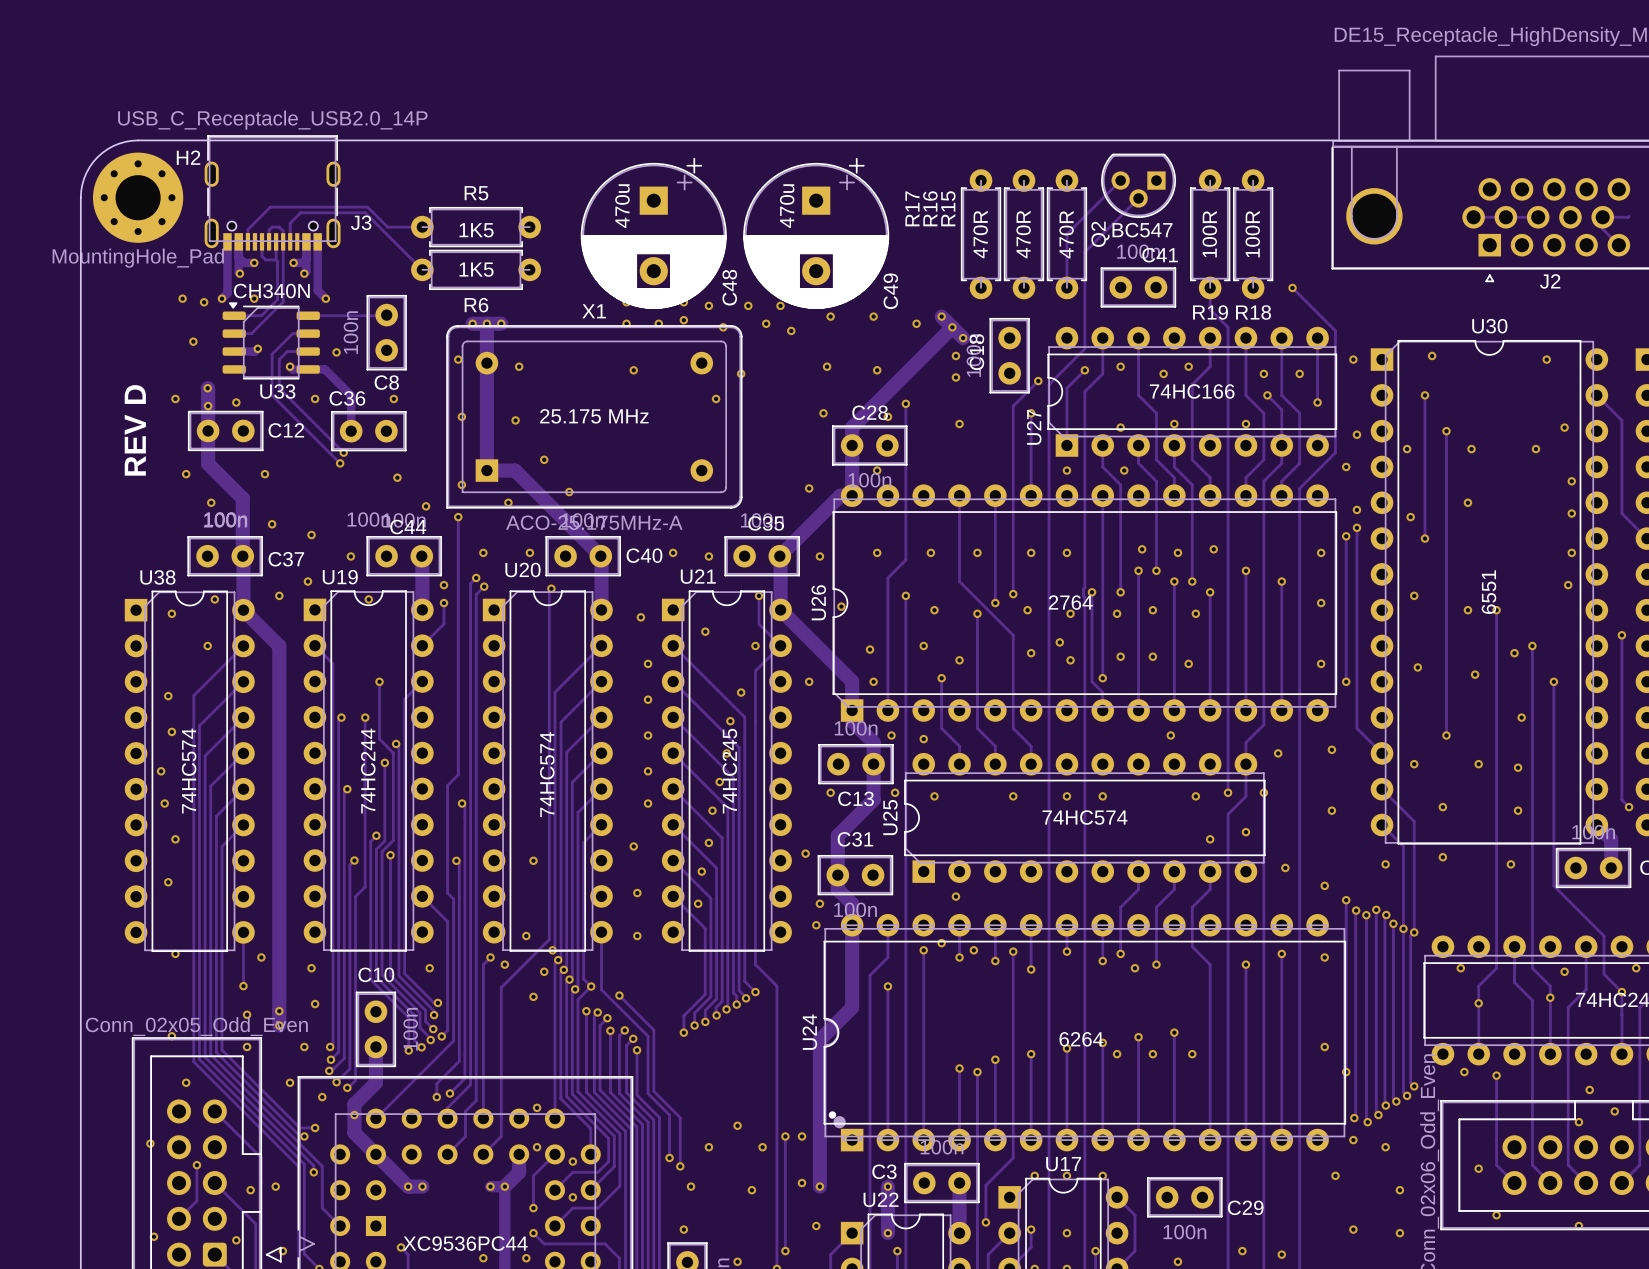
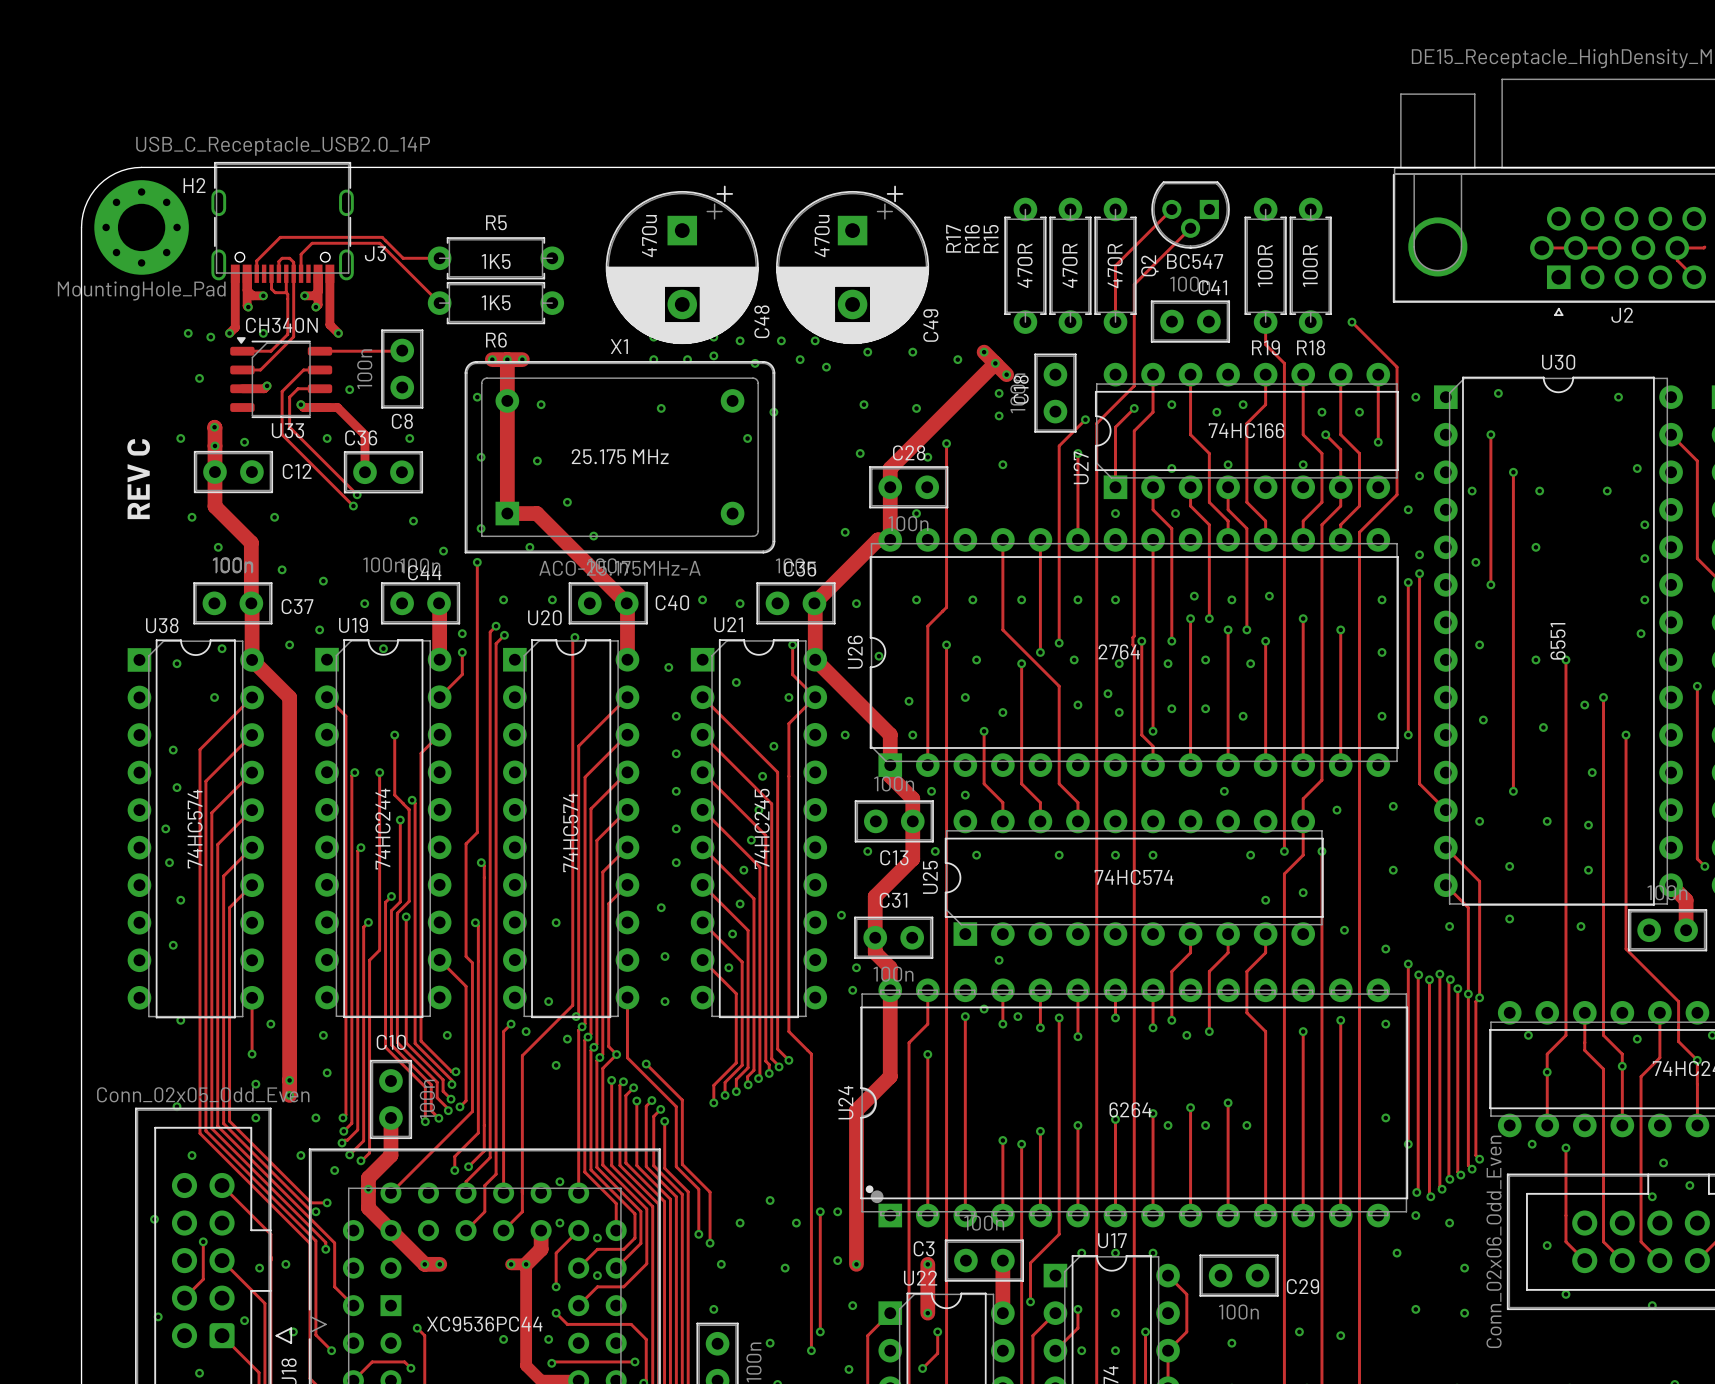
text: REV D (135, 430) -> REV C (138, 479)

